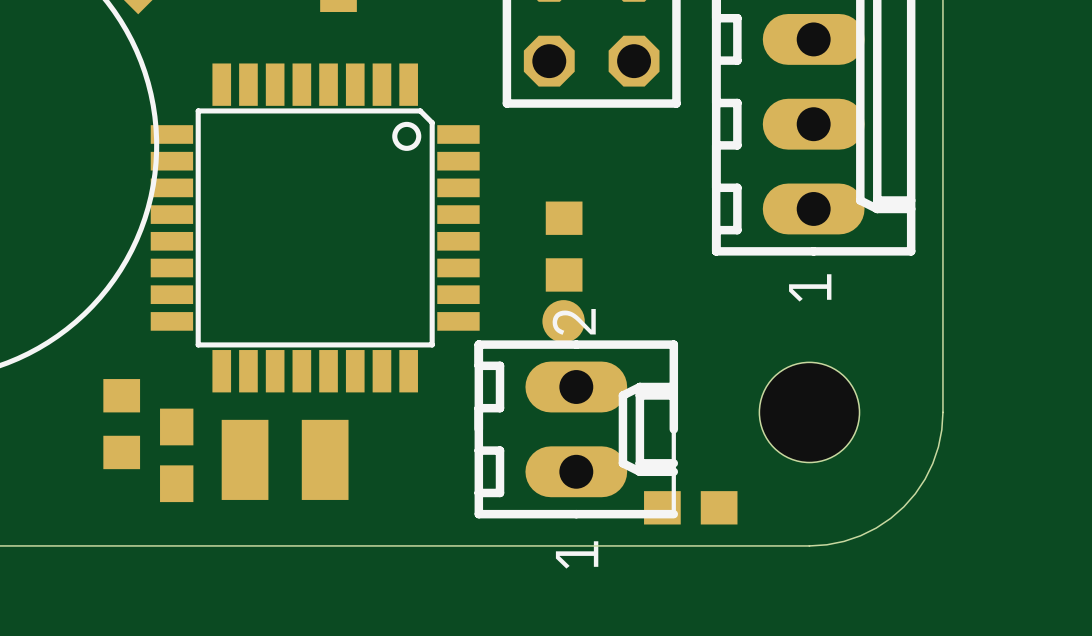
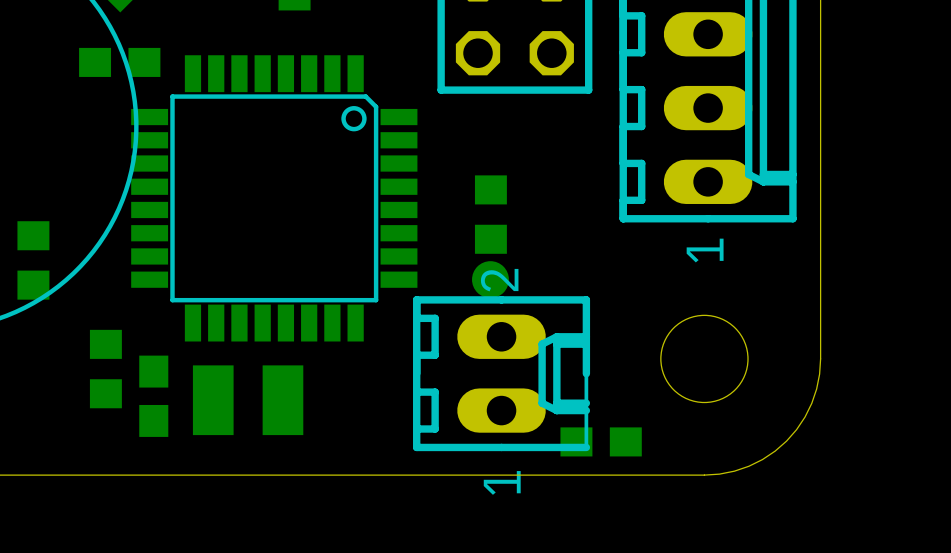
part: none -> (119, 62)
part: none -> (33, 260)

